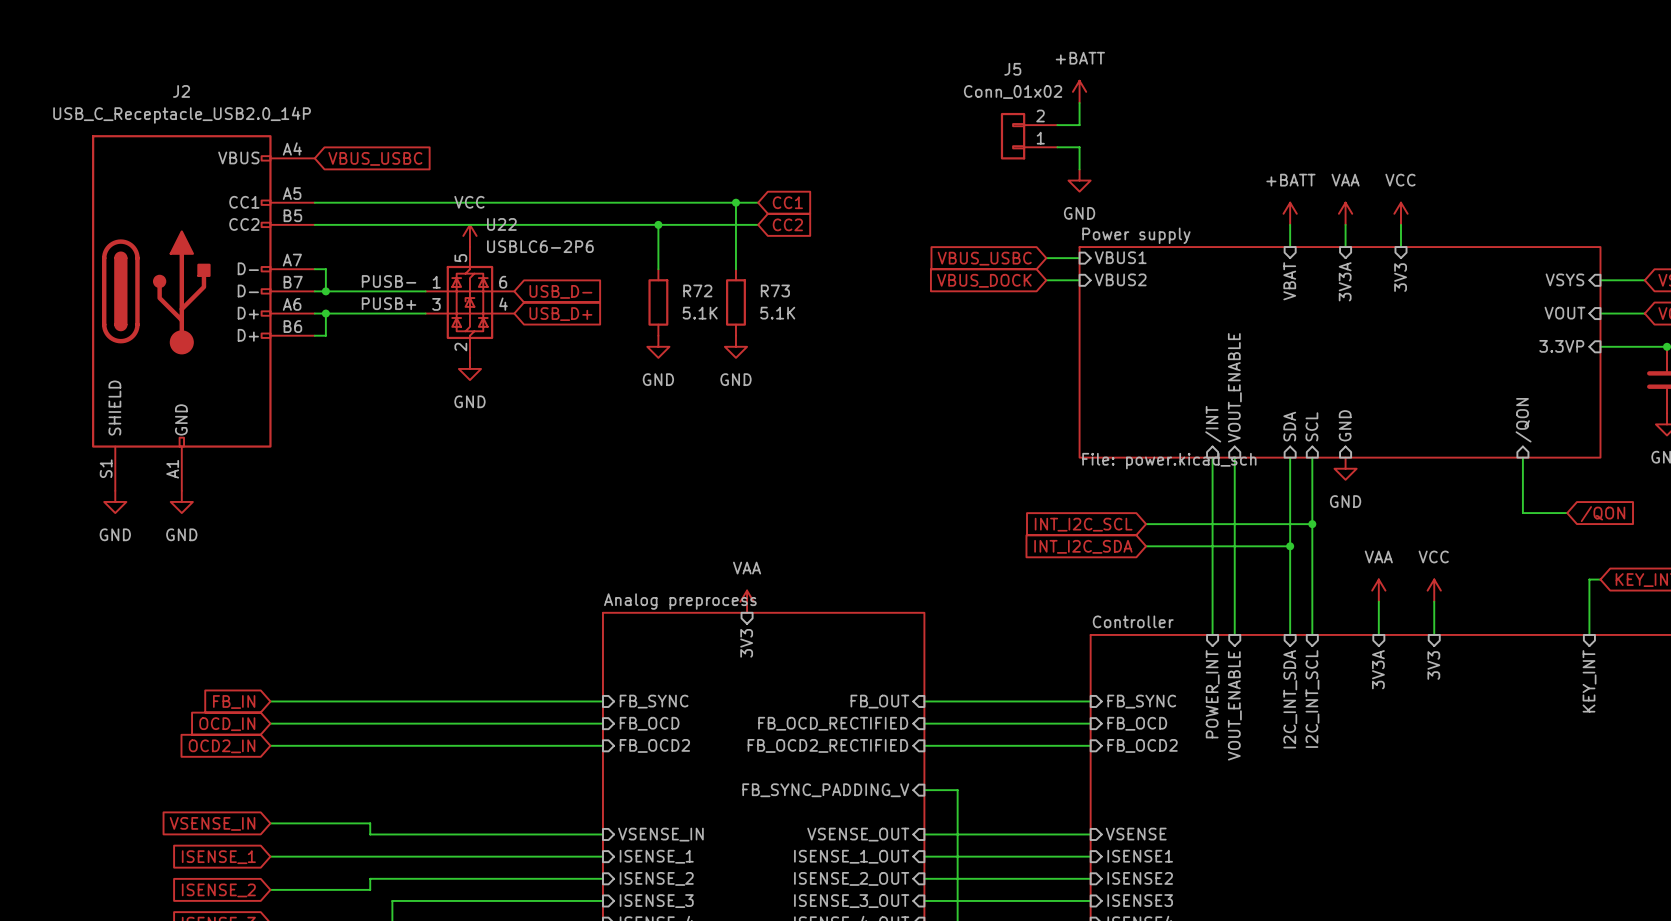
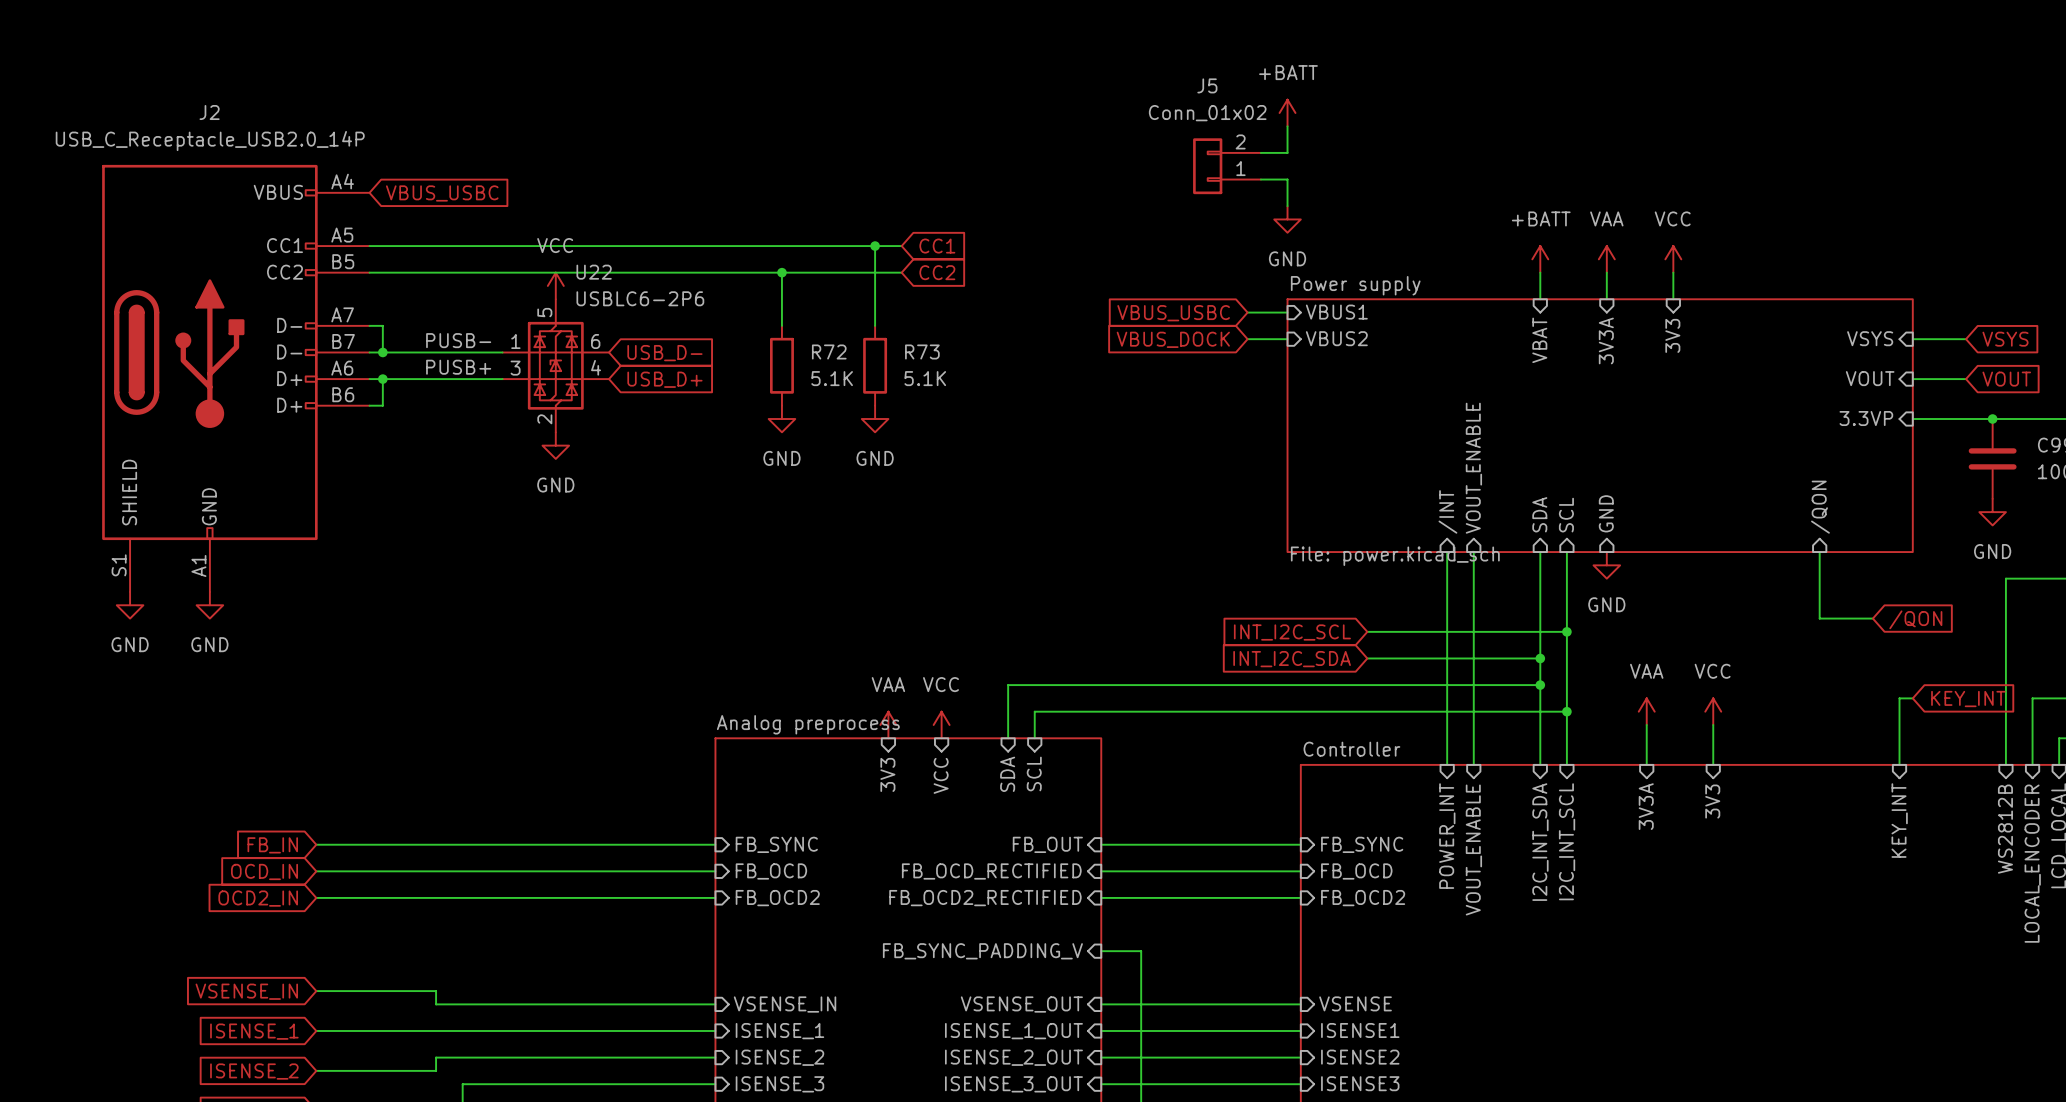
wire: none -> (1540, 685) (1008, 685) (1008, 738)
junction: none -> (1540, 685)
wire: none -> (1566, 711) (1034, 711) (1034, 738)
junction: none -> (1566, 711)
power symbol: none -> VCC (941, 724)
sheet pin: none -> SDA (1007, 774)
sheet pin: none -> SCL (1034, 773)
sheet pin: none -> VCC (941, 775)

